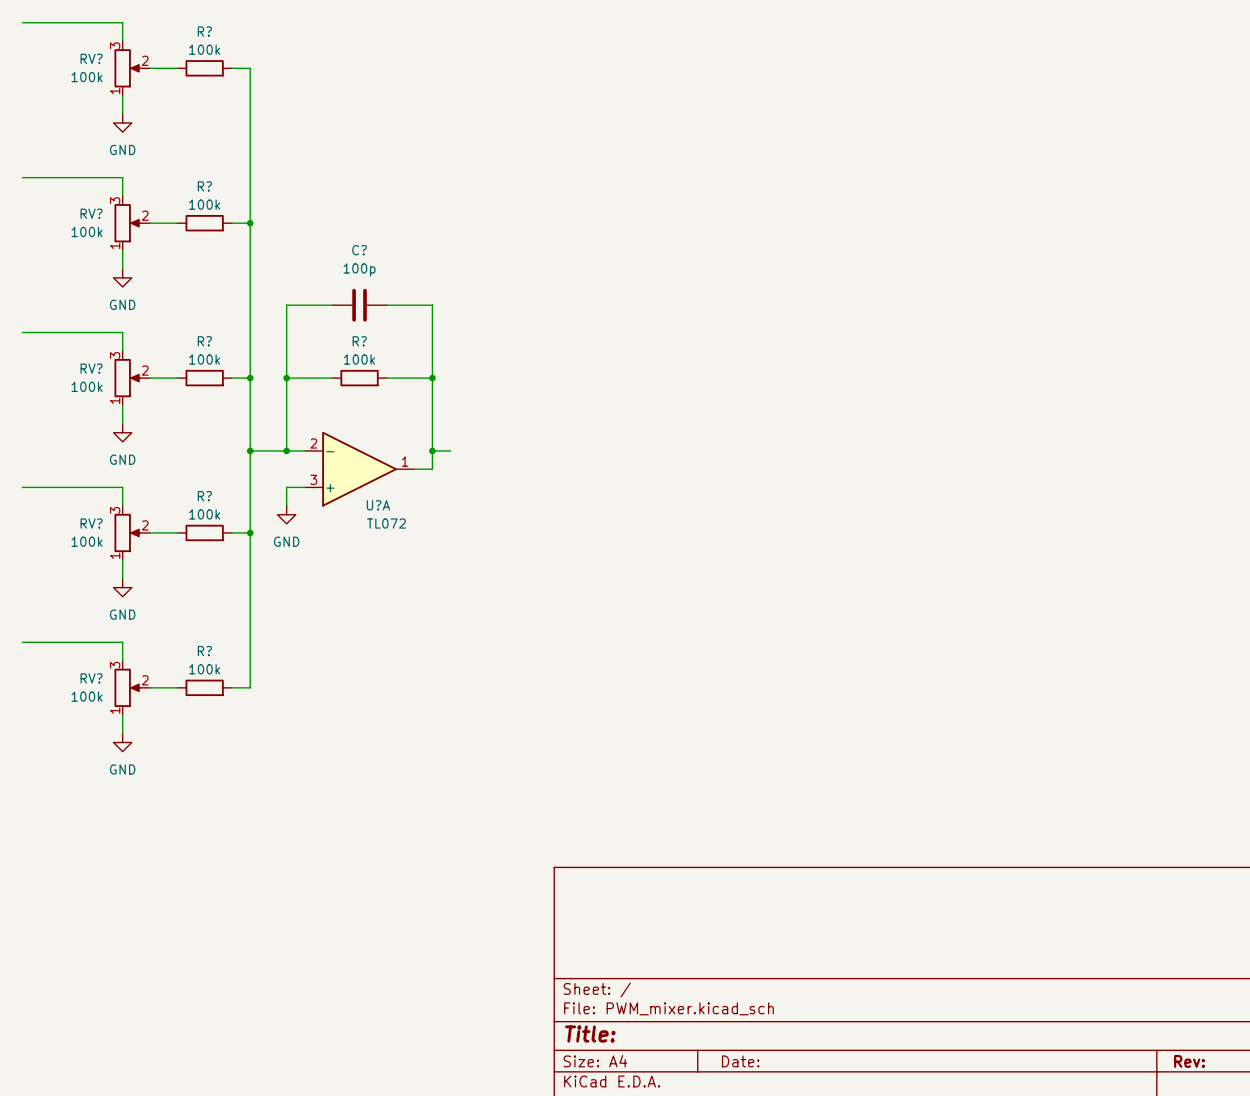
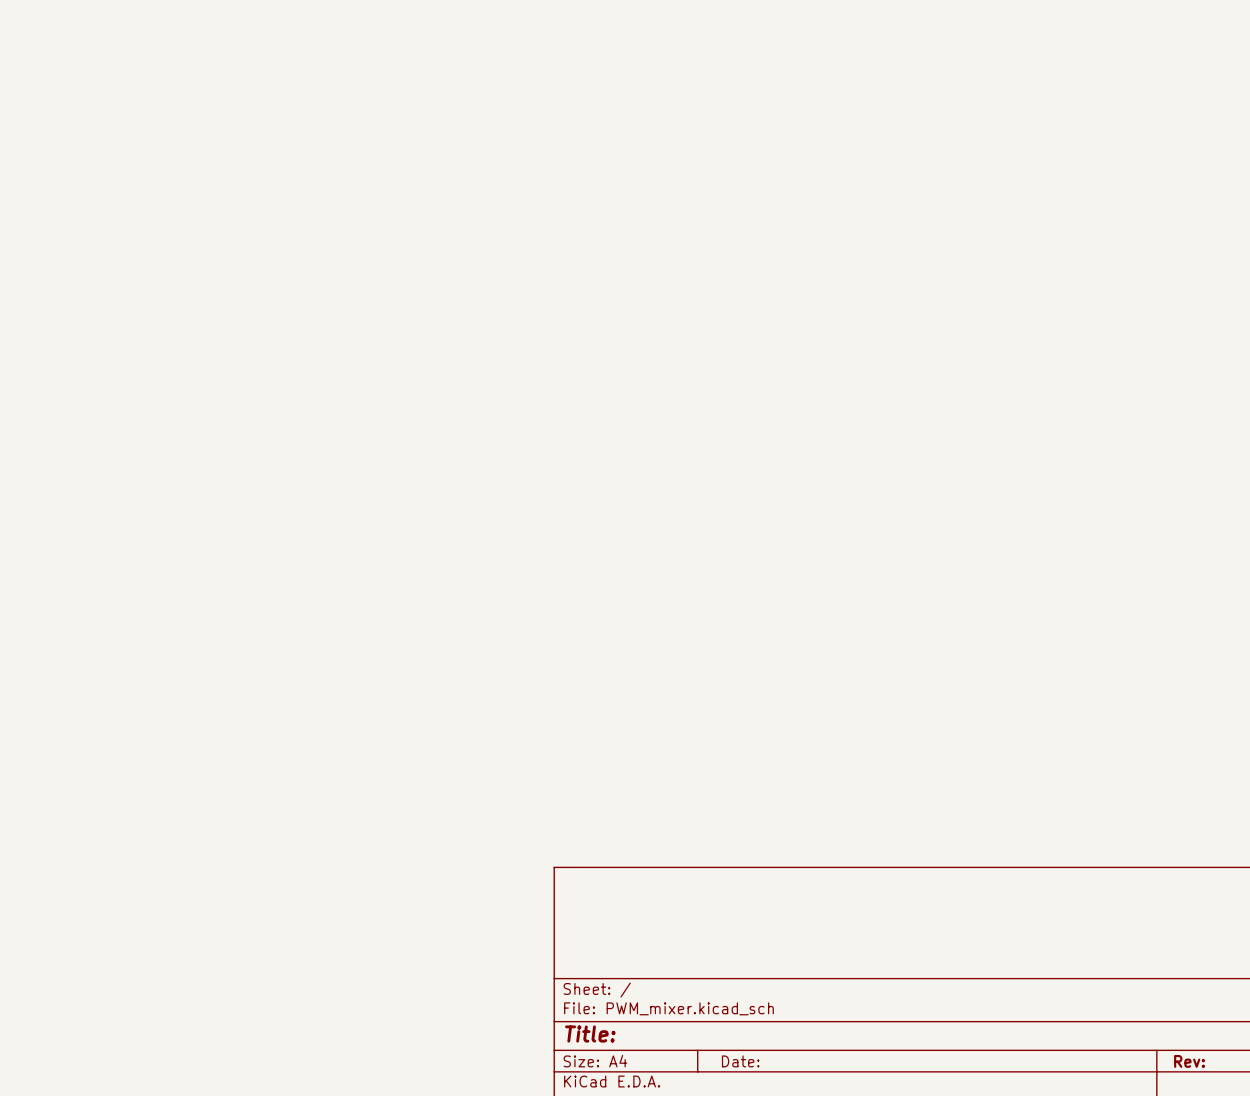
wire: (22, 22) (122, 22) (122, 40) -> none
RV?: 100k (132, 68) -> none
wire: (149, 68) (177, 68) -> none
R?: 100k (204, 68) -> none
wire: (231, 68) (250, 68) (250, 687) (231, 687) -> none
wire: (122, 95) (122, 113) -> none
power symbol: GND (122, 122) -> none
wire: (22, 177) (122, 177) (122, 195) -> none
RV?: 100k (132, 223) -> none
wire: (149, 223) (177, 223) -> none
R?: 100k (204, 223) -> none
wire: (231, 223) (250, 223) -> none
junction: (250, 223) -> none
wire: (122, 250) (122, 268) -> none
power symbol: GND (122, 277) -> none
wire: (332, 305) (286, 305) (286, 450) -> none
C?: 100p (359, 305) -> none
wire: (386, 305) (432, 305) (432, 469) (414, 469) -> none
wire: (22, 332) (122, 332) (122, 350) -> none
RV?: 100k (132, 378) -> none
wire: (149, 378) (177, 378) -> none
R?: 100k (204, 378) -> none
wire: (231, 378) (250, 378) -> none
junction: (250, 378) -> none
wire: (286, 378) (332, 378) -> none
junction: (286, 378) -> none
R?: 100k (359, 378) -> none
wire: (386, 378) (432, 378) -> none
junction: (432, 378) -> none
wire: (122, 405) (122, 423) -> none
power symbol: GND (122, 432) -> none
wire: (250, 450) (304, 450) -> none
junction: (250, 450) -> none
junction: (286, 450) -> none
wire: (432, 450) (450, 450) -> none
junction: (432, 450) -> none
U?A: TL072 (359, 469) -> none
wire: (22, 487) (122, 487) (122, 505) -> none
wire: (304, 487) (286, 487) (286, 505) -> none
power symbol: GND (286, 514) -> none
RV?: 100k (132, 532) -> none
wire: (149, 532) (177, 532) -> none
R?: 100k (204, 532) -> none
wire: (231, 532) (250, 532) -> none
junction: (250, 532) -> none
wire: (122, 560) (122, 578) -> none
power symbol: GND (122, 587) -> none
wire: (22, 642) (122, 642) (122, 660) -> none
RV?: 100k (132, 687) -> none
wire: (149, 687) (177, 687) -> none
R?: 100k (204, 687) -> none
wire: (122, 715) (122, 733) -> none
power symbol: GND (122, 742) -> none

